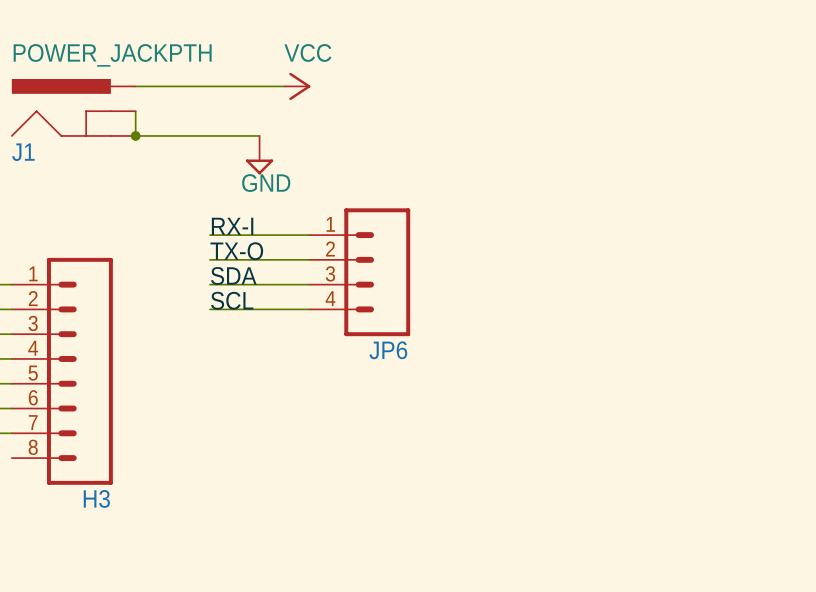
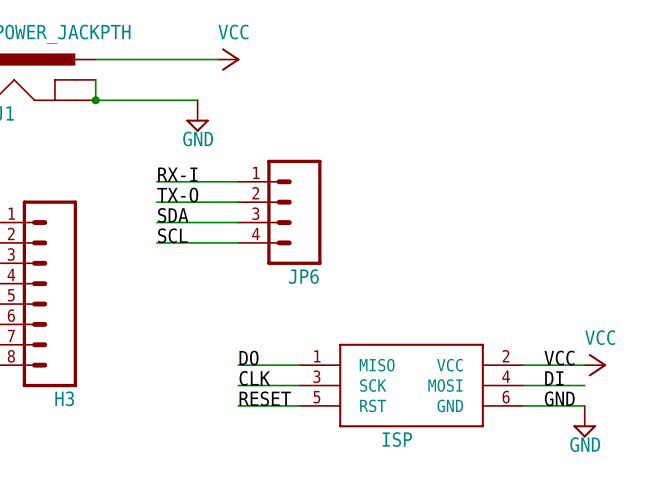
label: none -> DO (249, 358)
label: none -> VCC (559, 358)
wire: none -> (238, 365) (299, 365)
wire: none -> (523, 365) (584, 365)
power symbol: none -> VCC (595, 365)
label: none -> CLK (254, 378)
label: none -> DI (554, 378)
wire: none -> (238, 385) (299, 385)
ISP: none -> (411, 385)
wire: none -> (523, 385) (584, 385)
label: none -> RESET (265, 398)
label: none -> GND (559, 398)
wire: none -> (238, 405) (299, 405)
wire: none -> (523, 405) (584, 405)
power symbol: none -> GND (584, 421)

